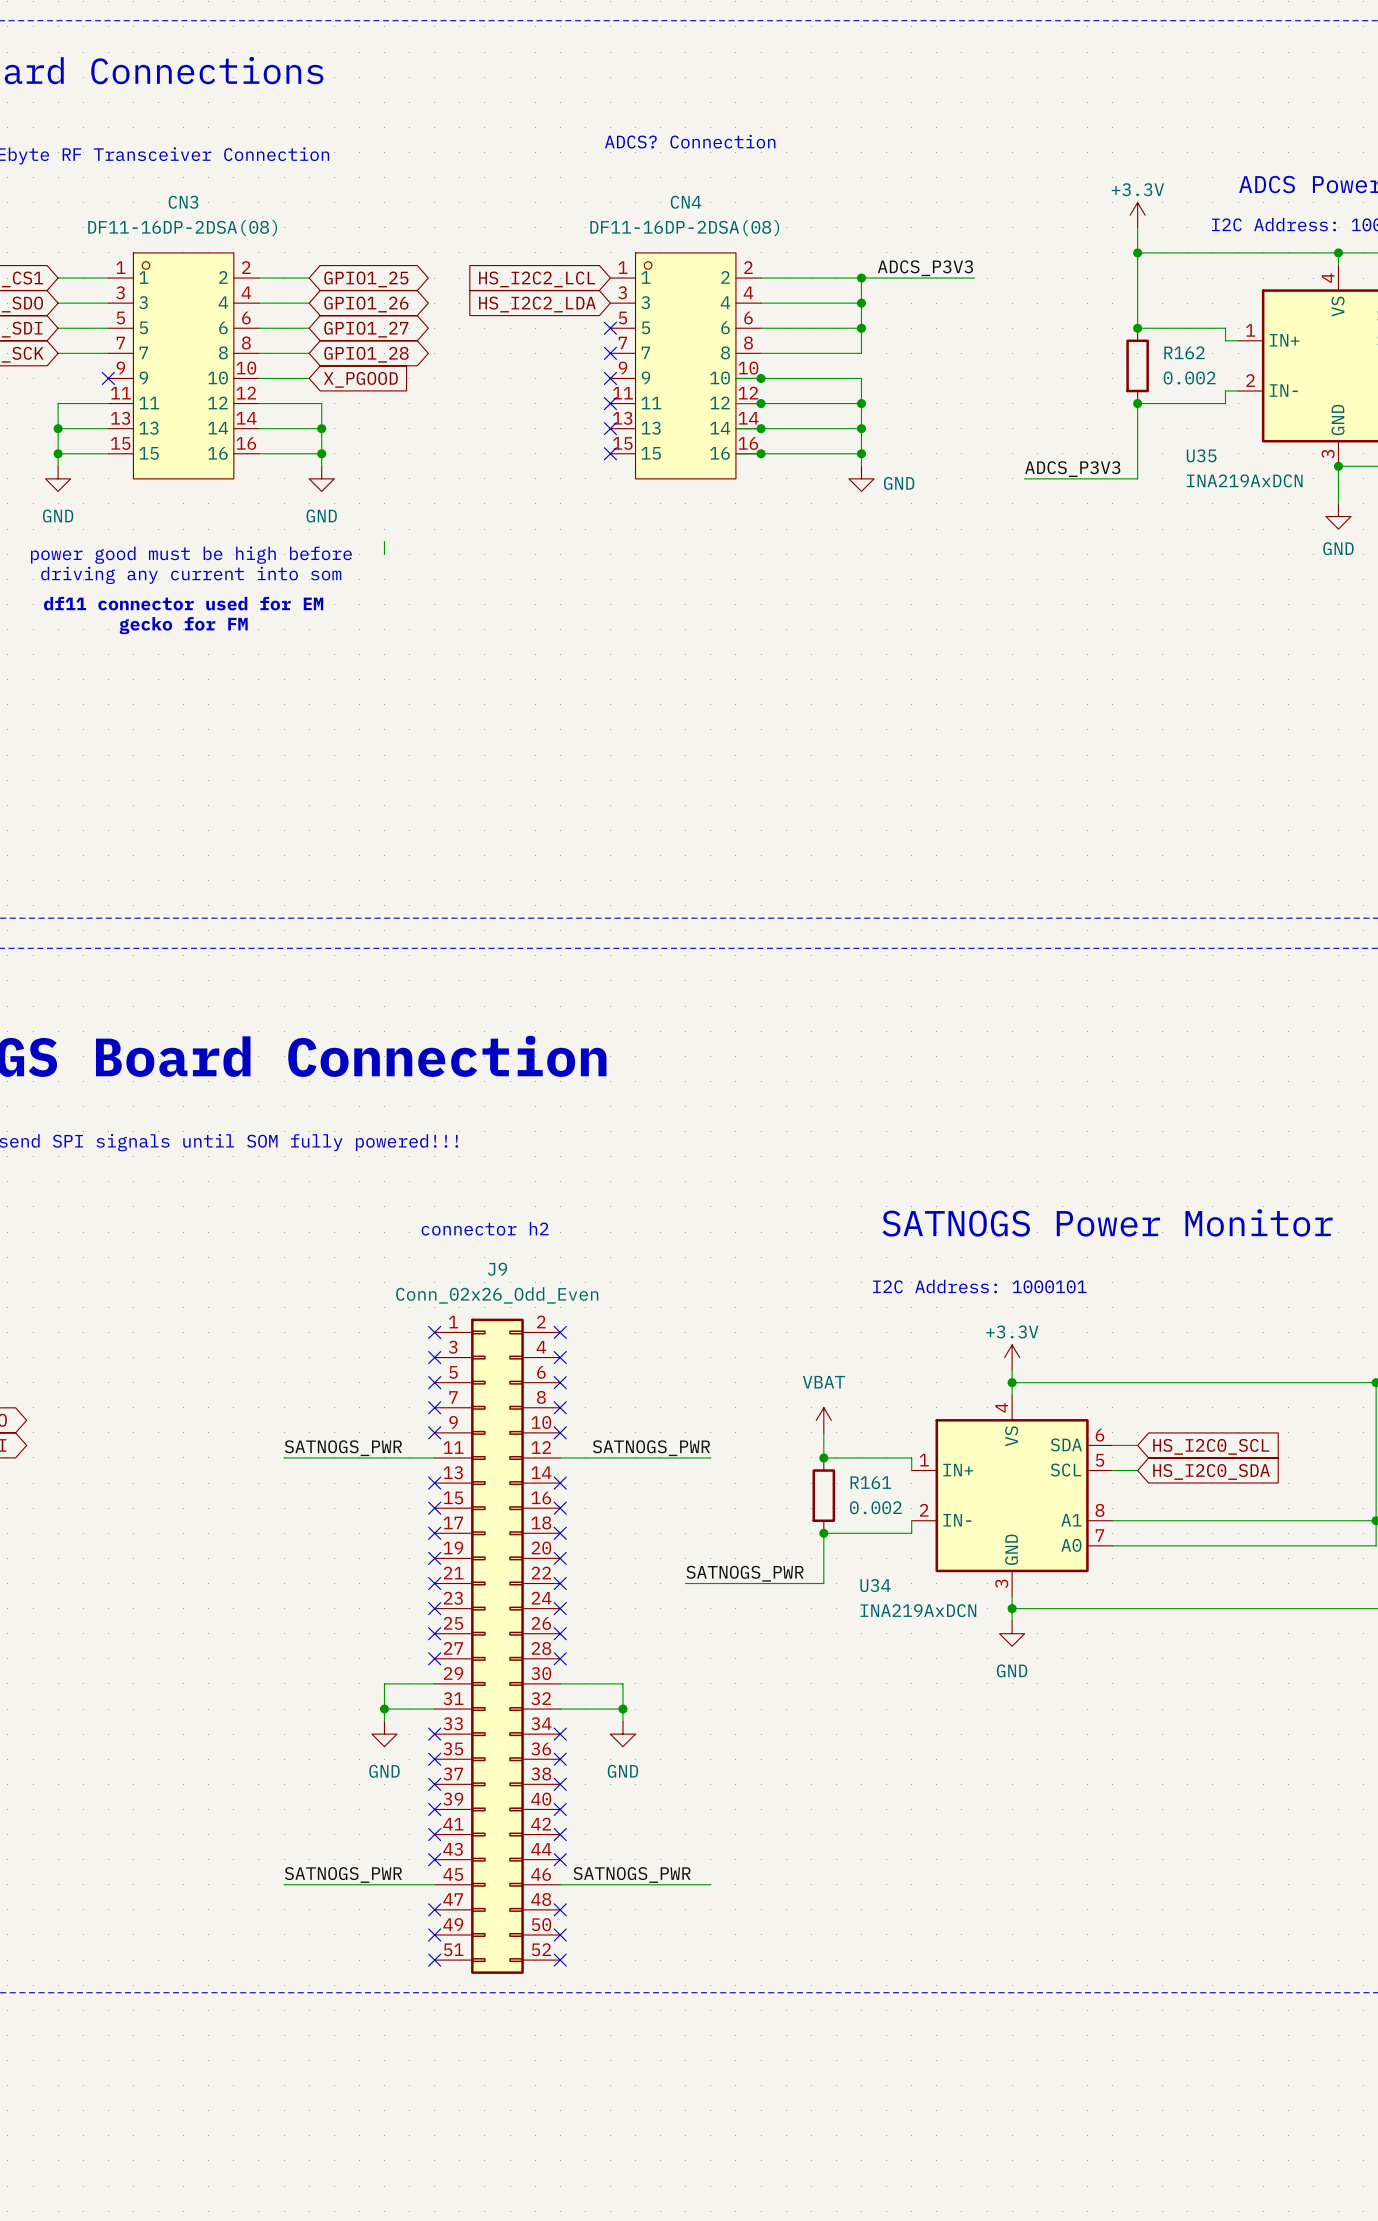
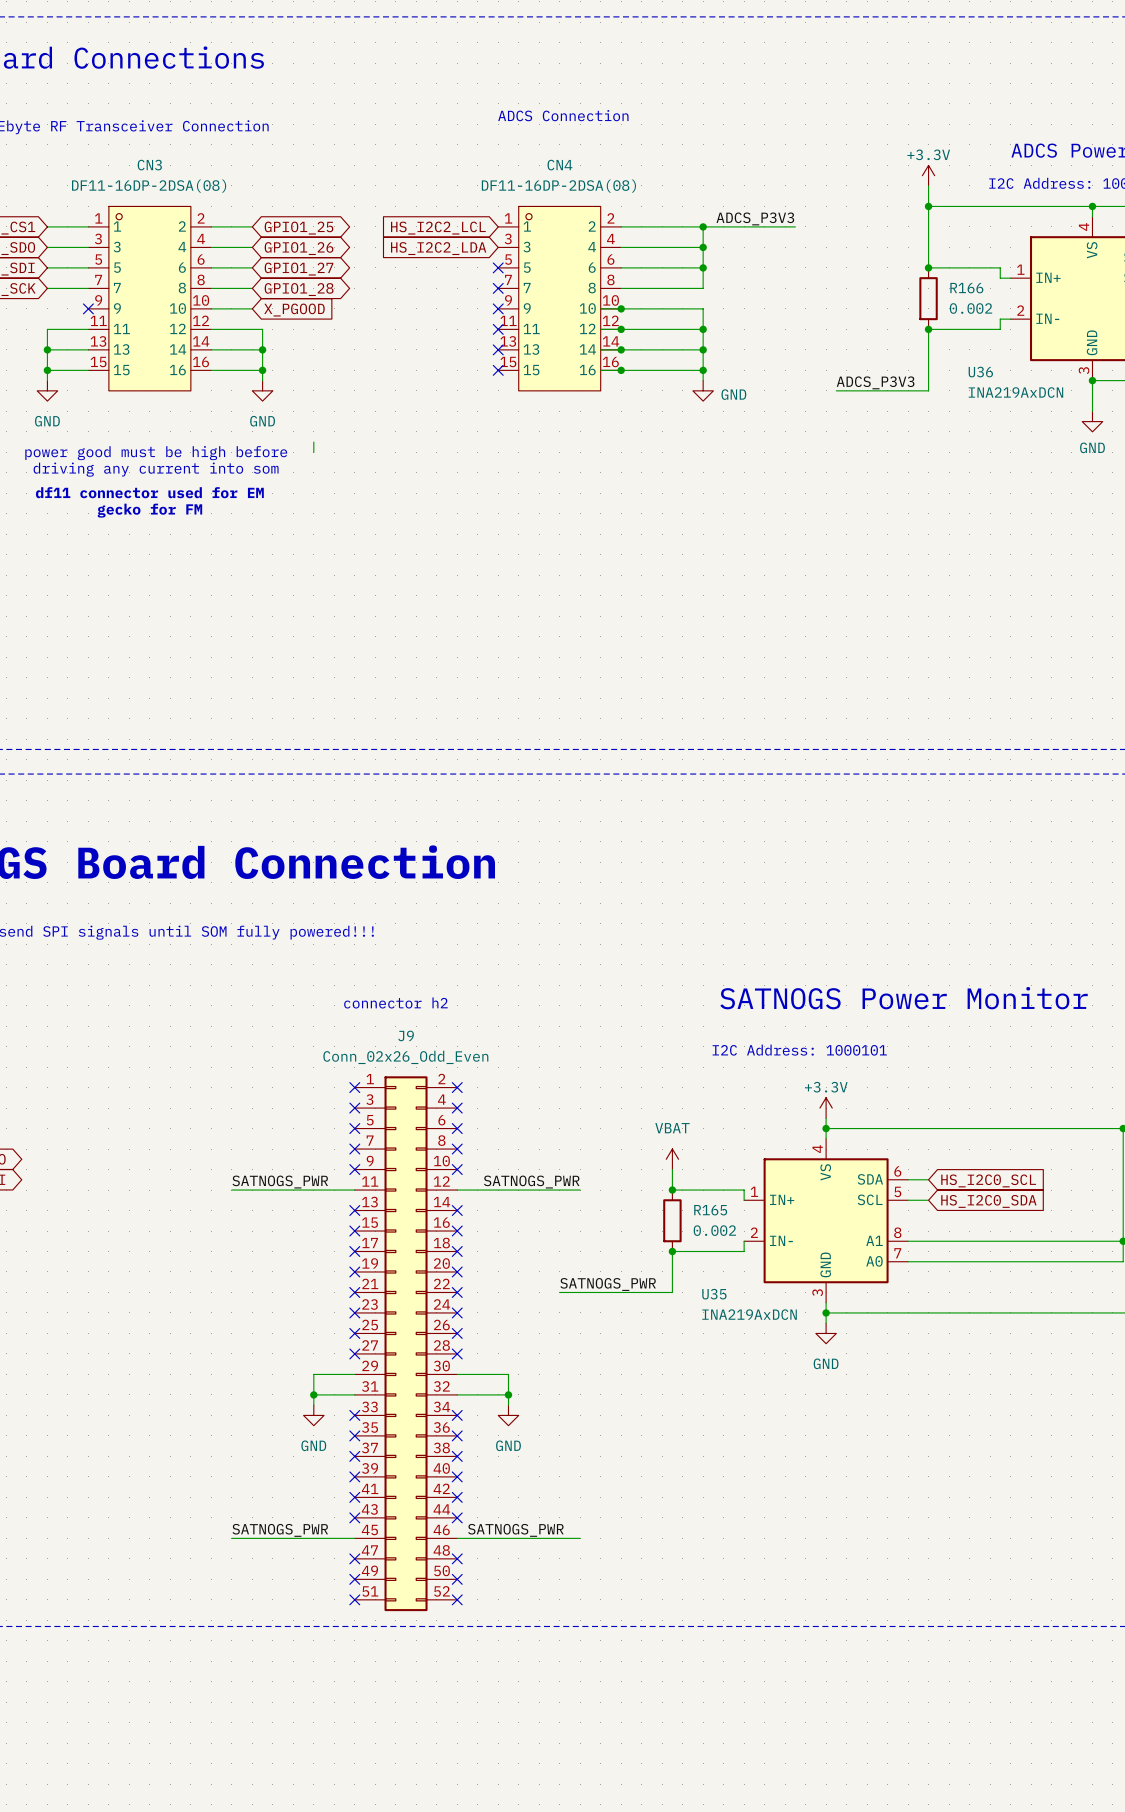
text: ADCS? Connection (690, 141) -> ADCS Connection (563, 115)
R162 name: R162 (1184, 352) -> R166 (966, 288)
U35 name: U35 (1201, 455) -> U36 (980, 372)
R161 name: R161 (870, 1482) -> R165 (710, 1210)
U34 name: U34 (875, 1585) -> U35 (714, 1294)

